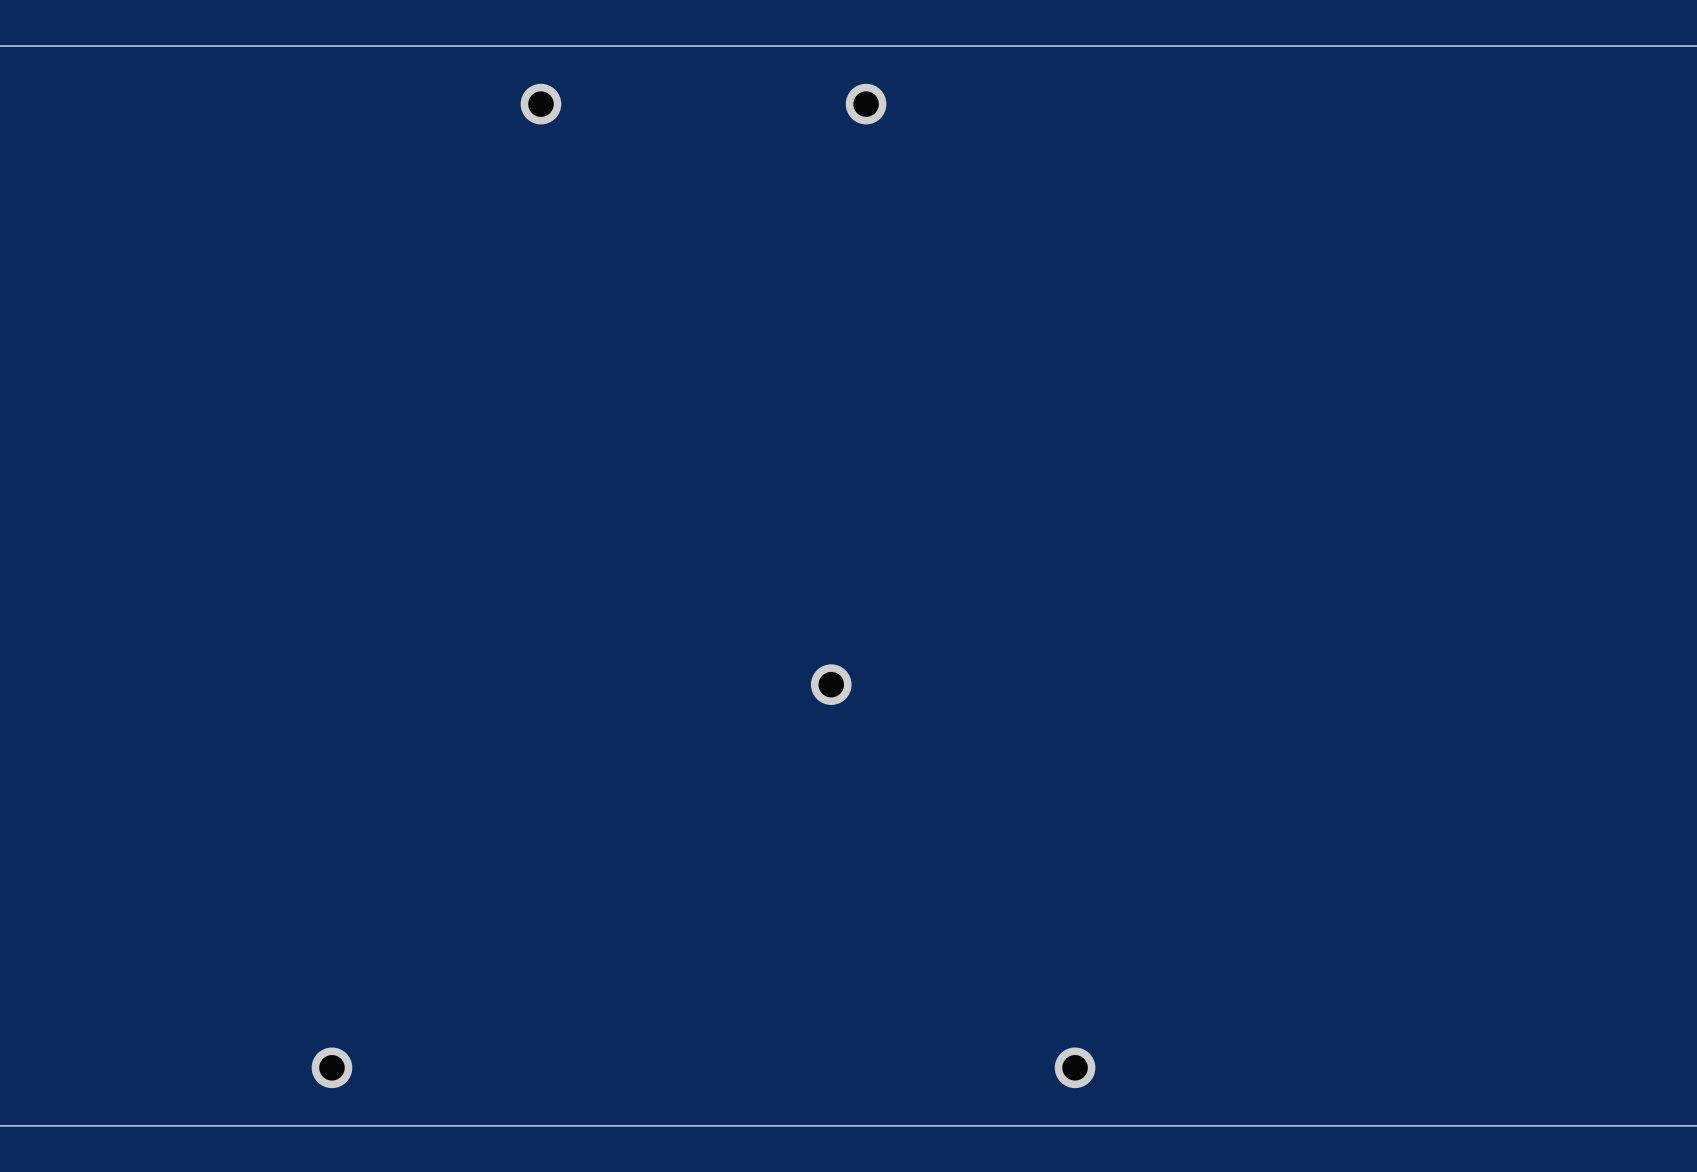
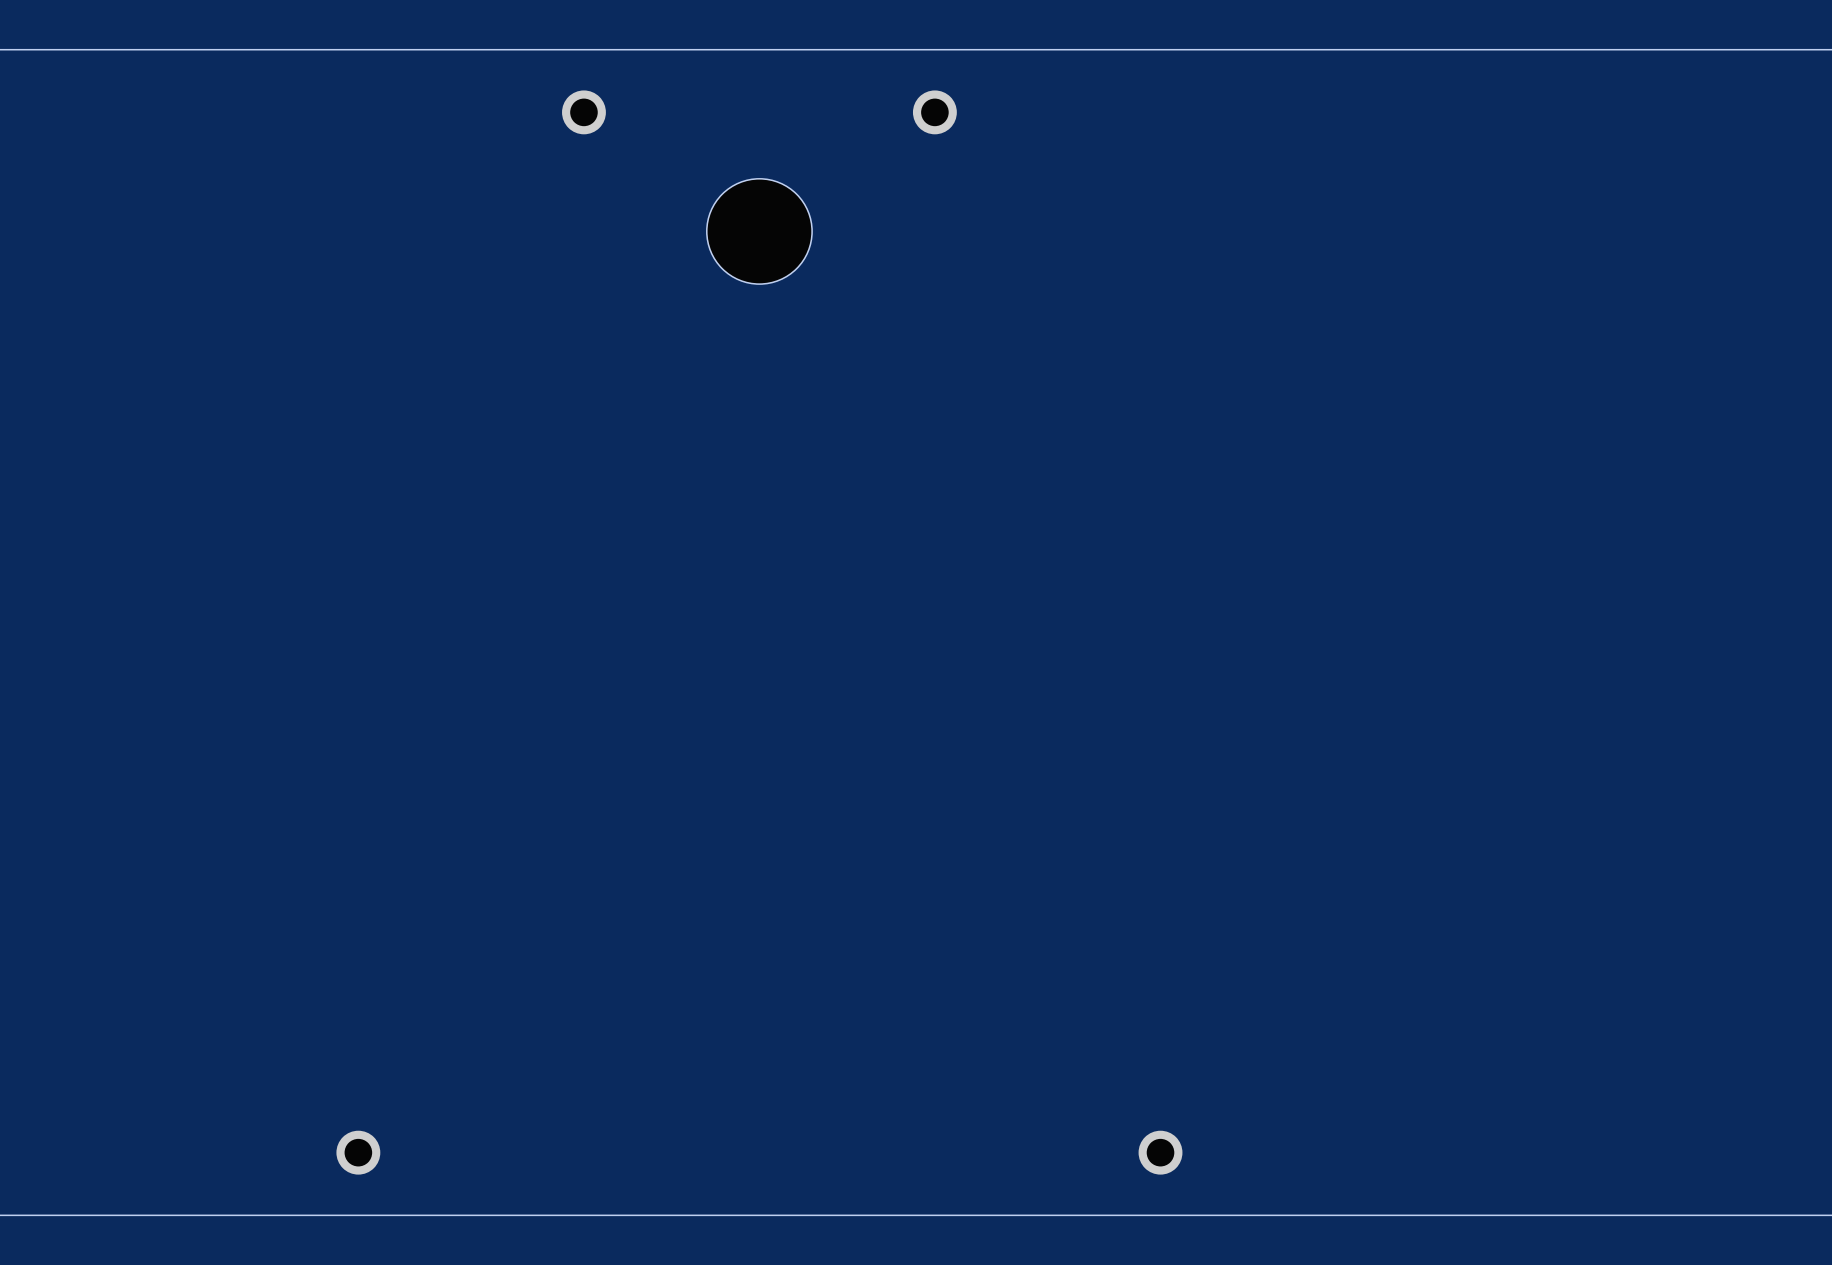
part: none -> (759, 231)
part: (831, 684) -> none

